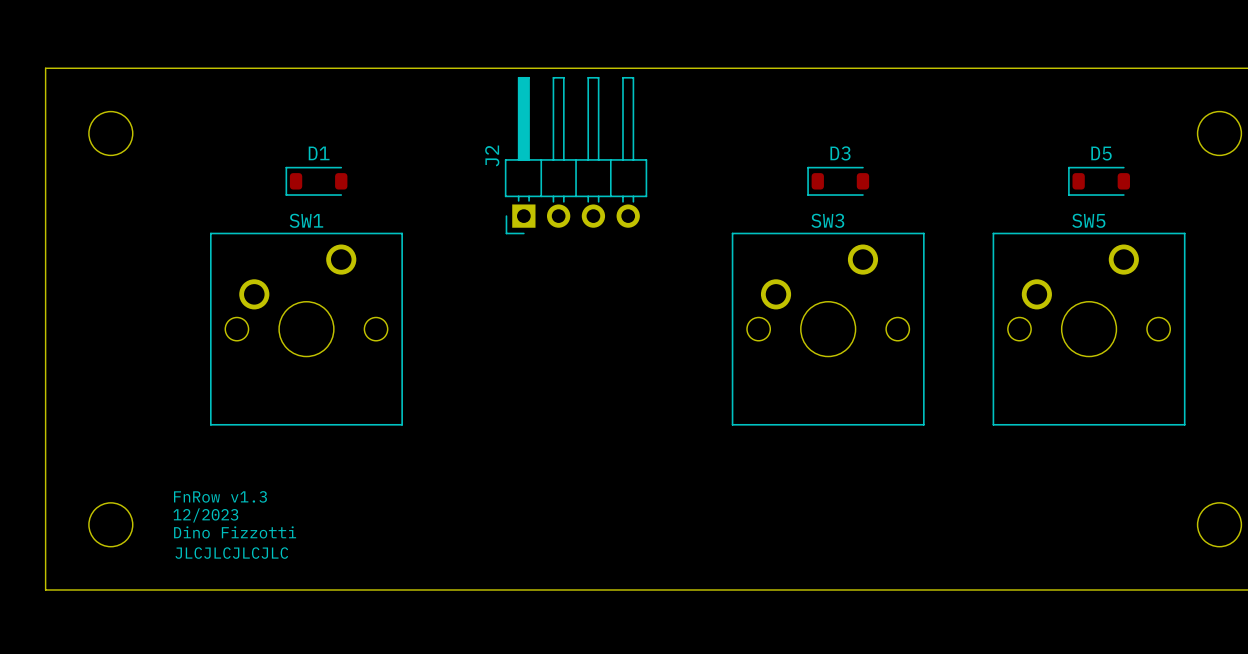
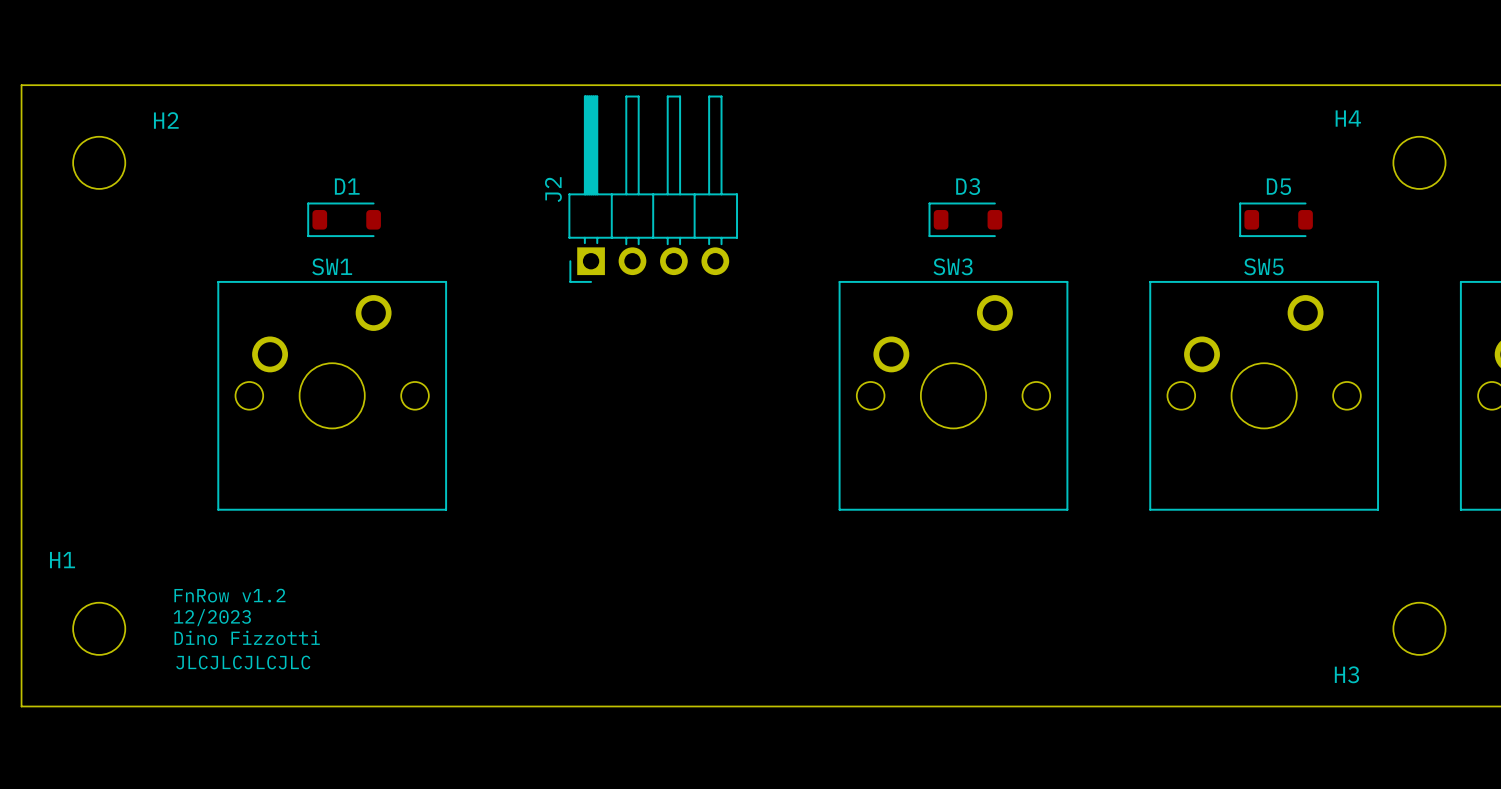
H4 name: none -> H4 (1348, 118)
H2 name: none -> H2 (166, 120)
H1 name: none -> H1 (62, 560)
text: FnRow v1.3 (220, 496) -> FnRow v1.2 (229, 595)
H3 name: none -> H3 (1346, 674)

